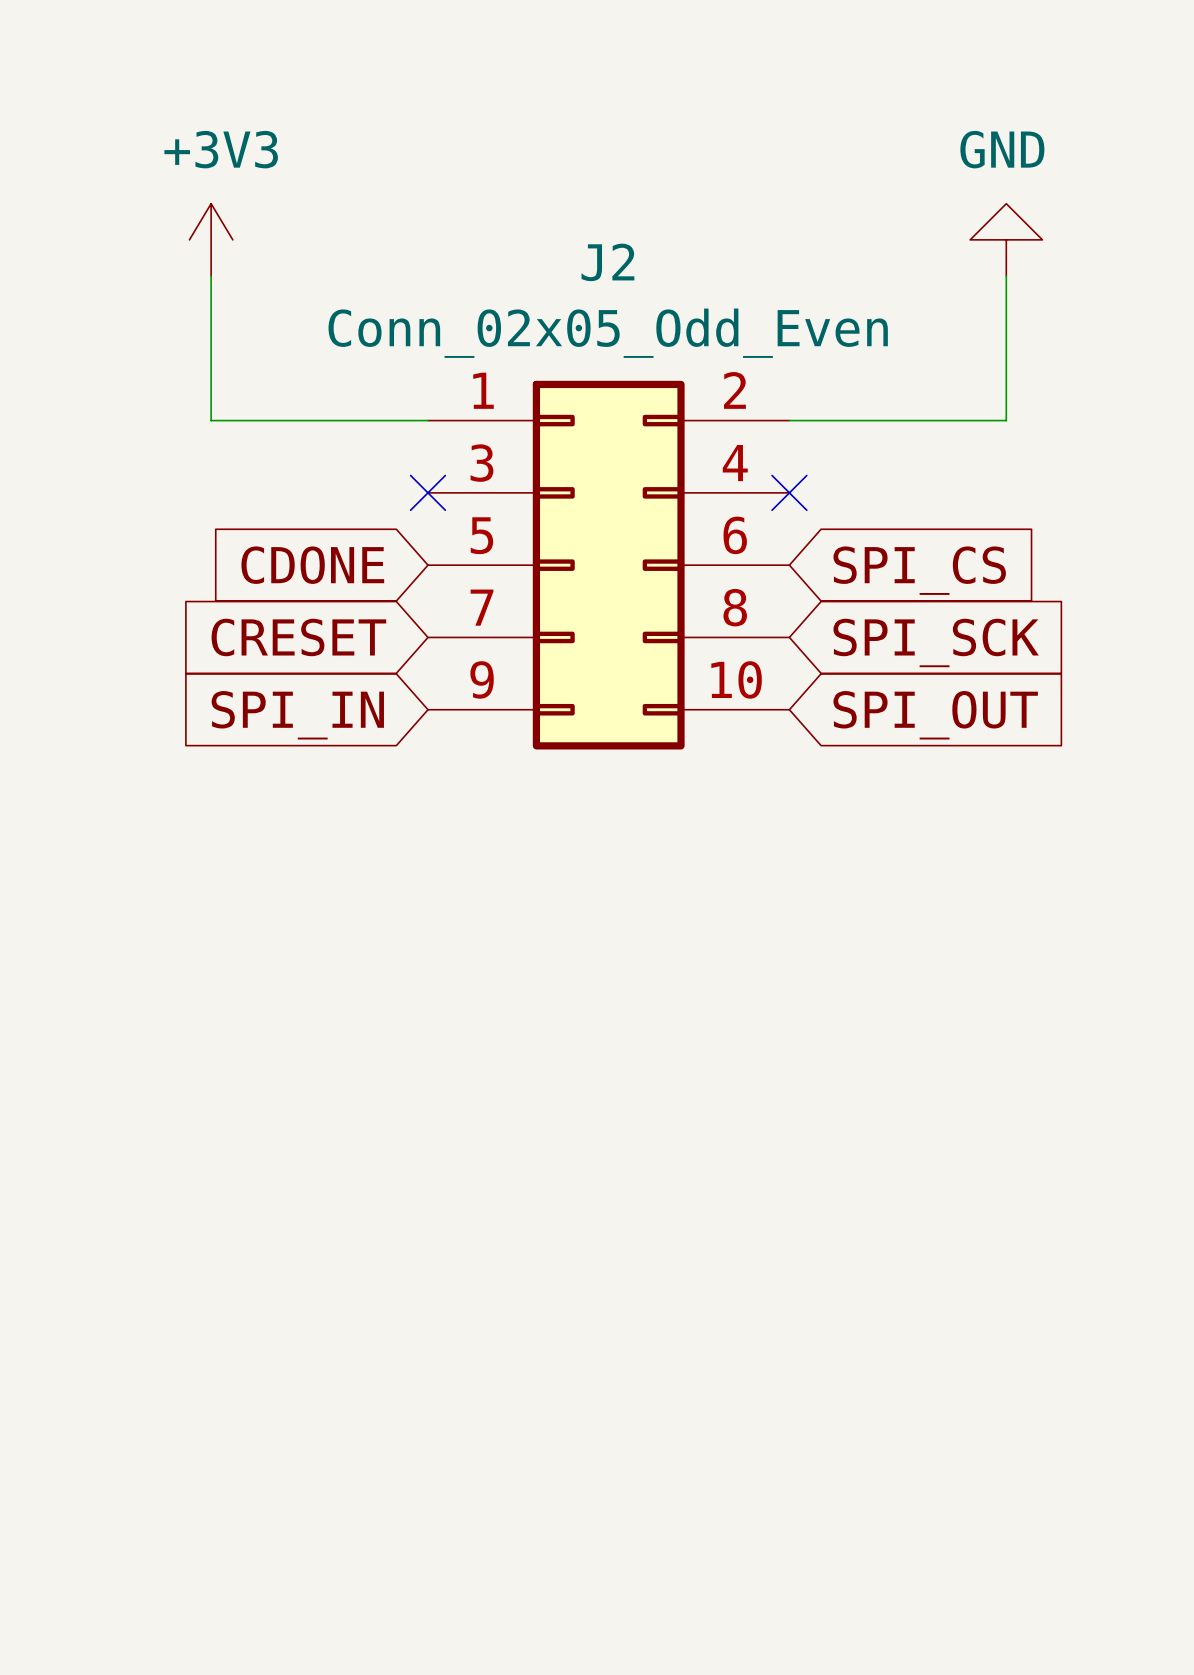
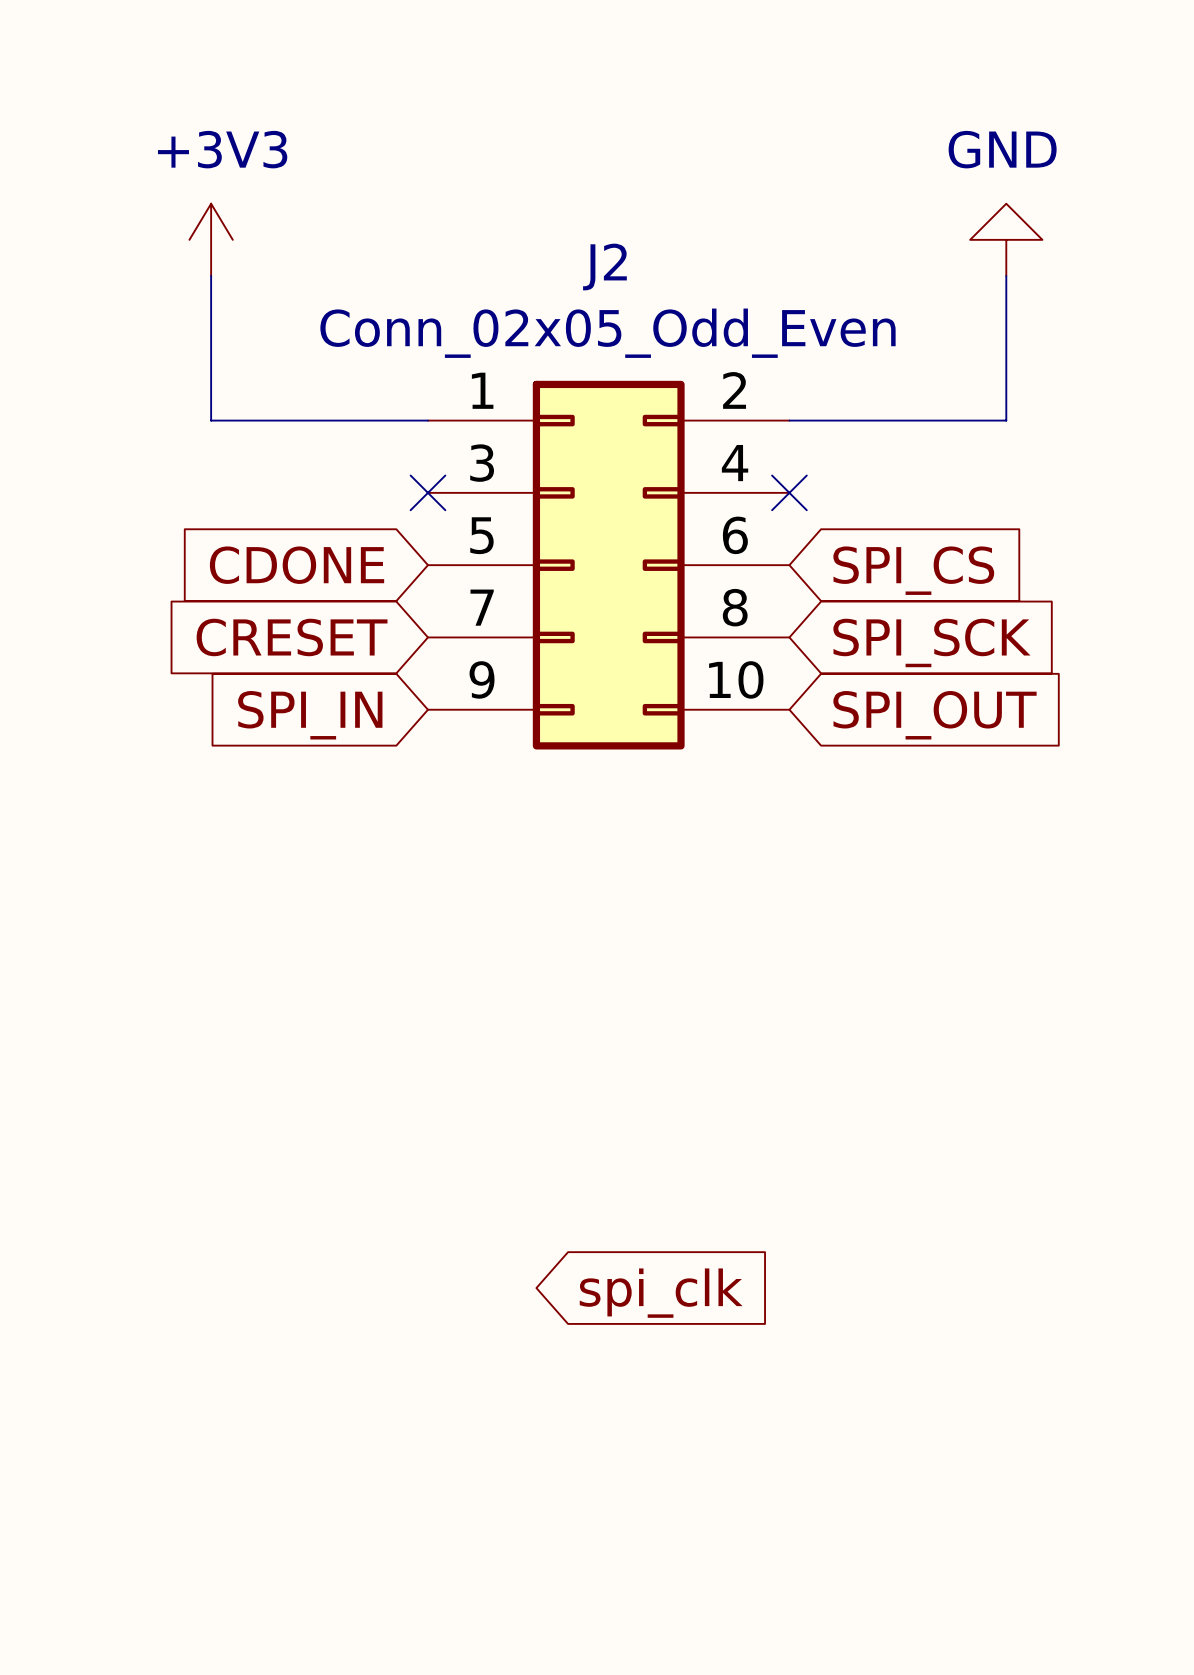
global label: none -> spi_clk (661, 1293)

